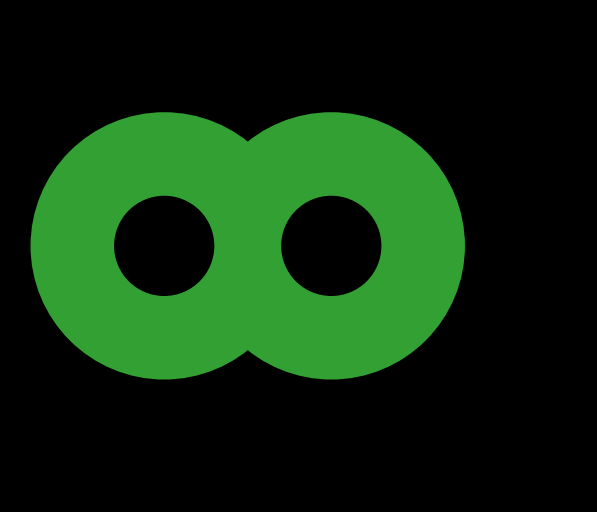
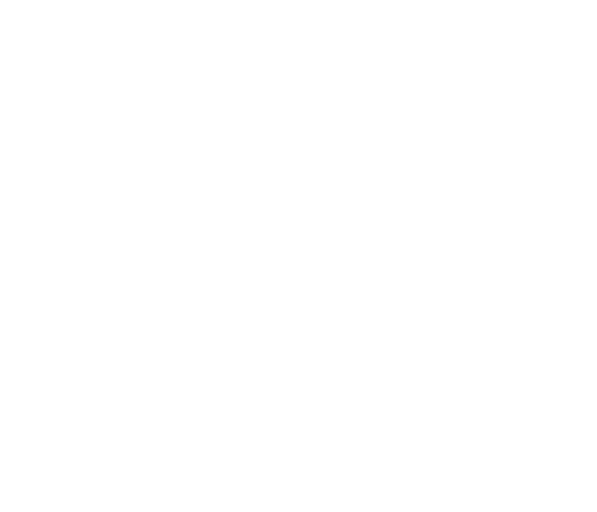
part: (247, 245) -> none

